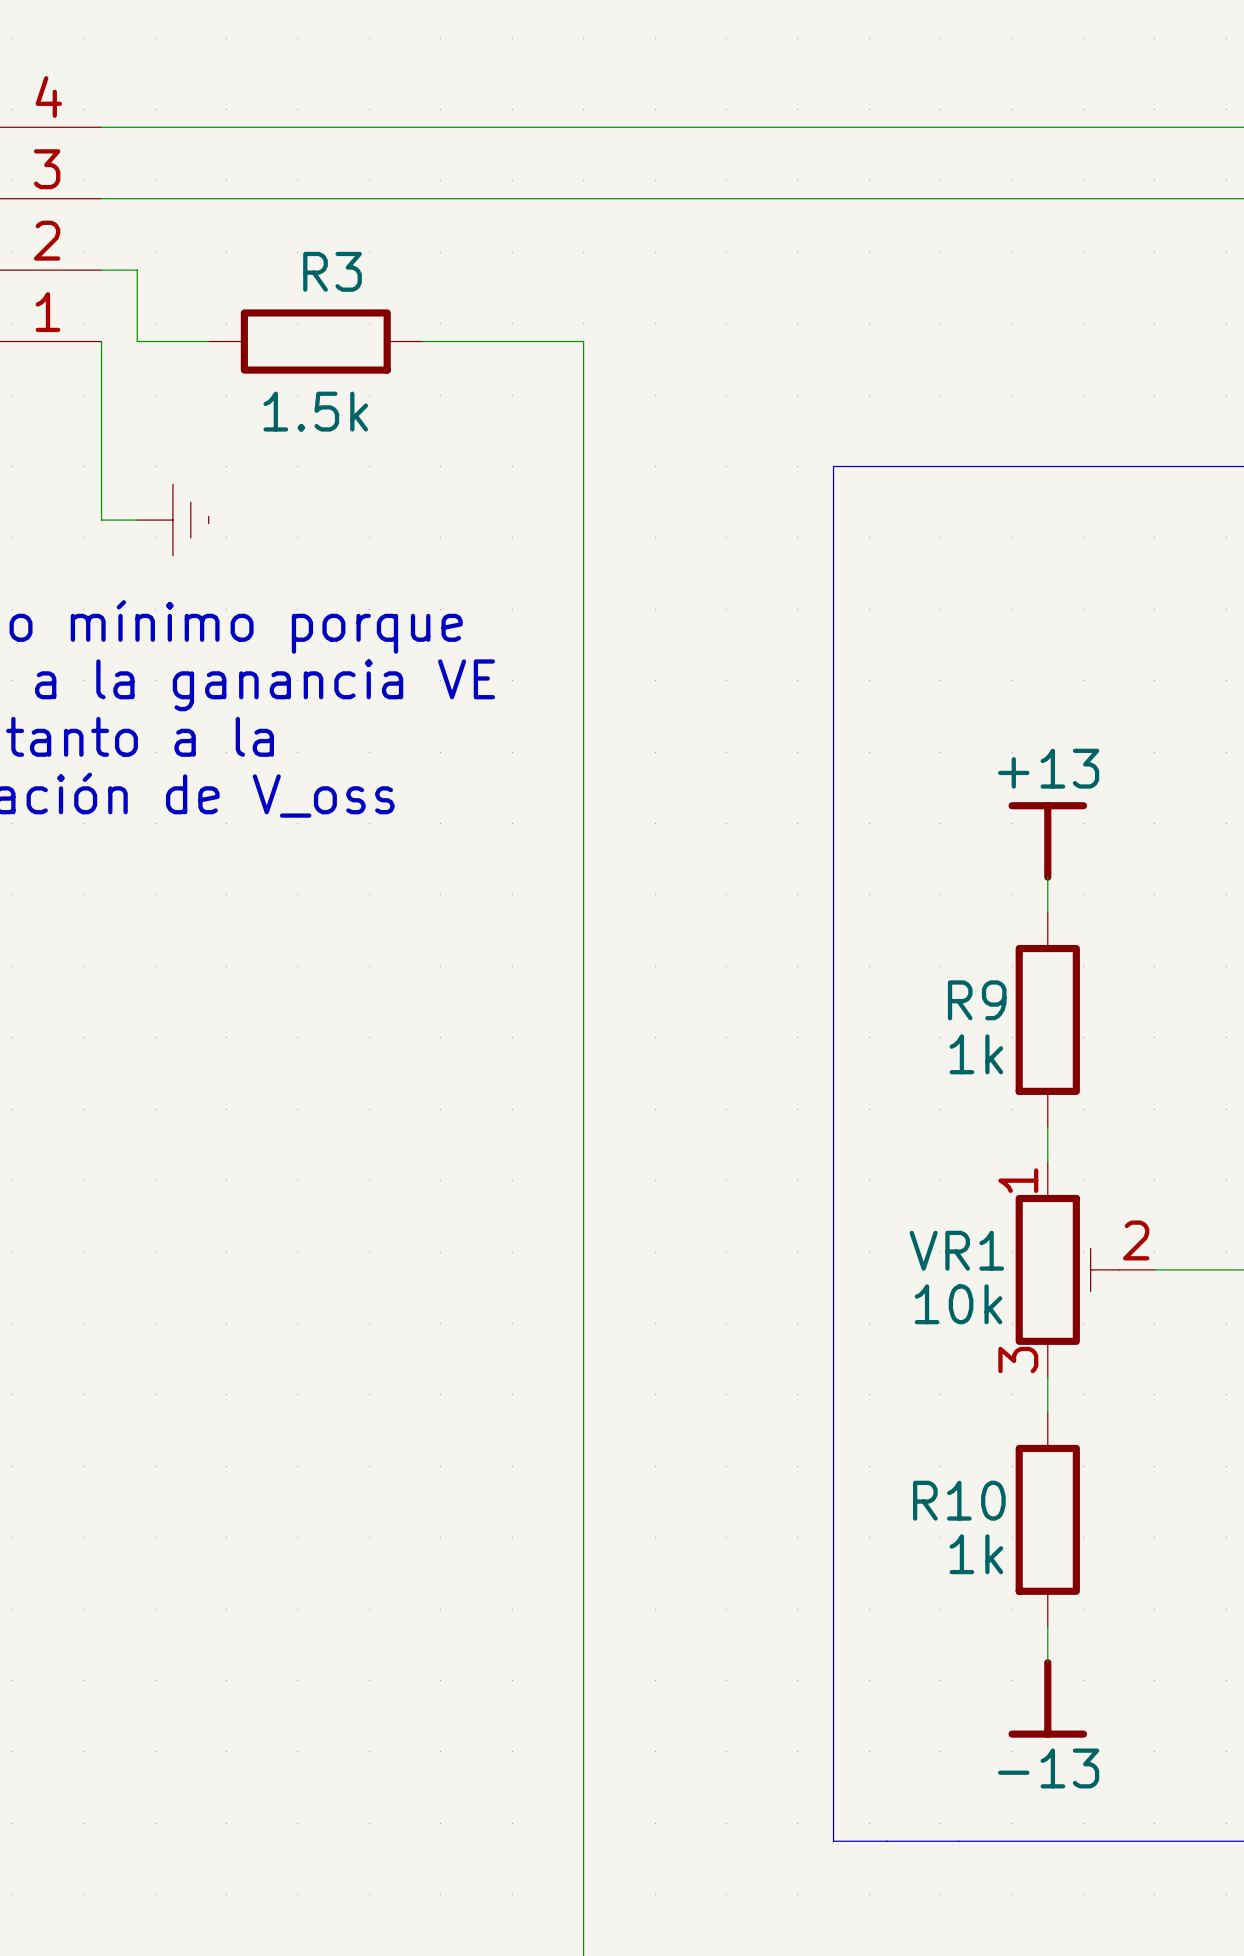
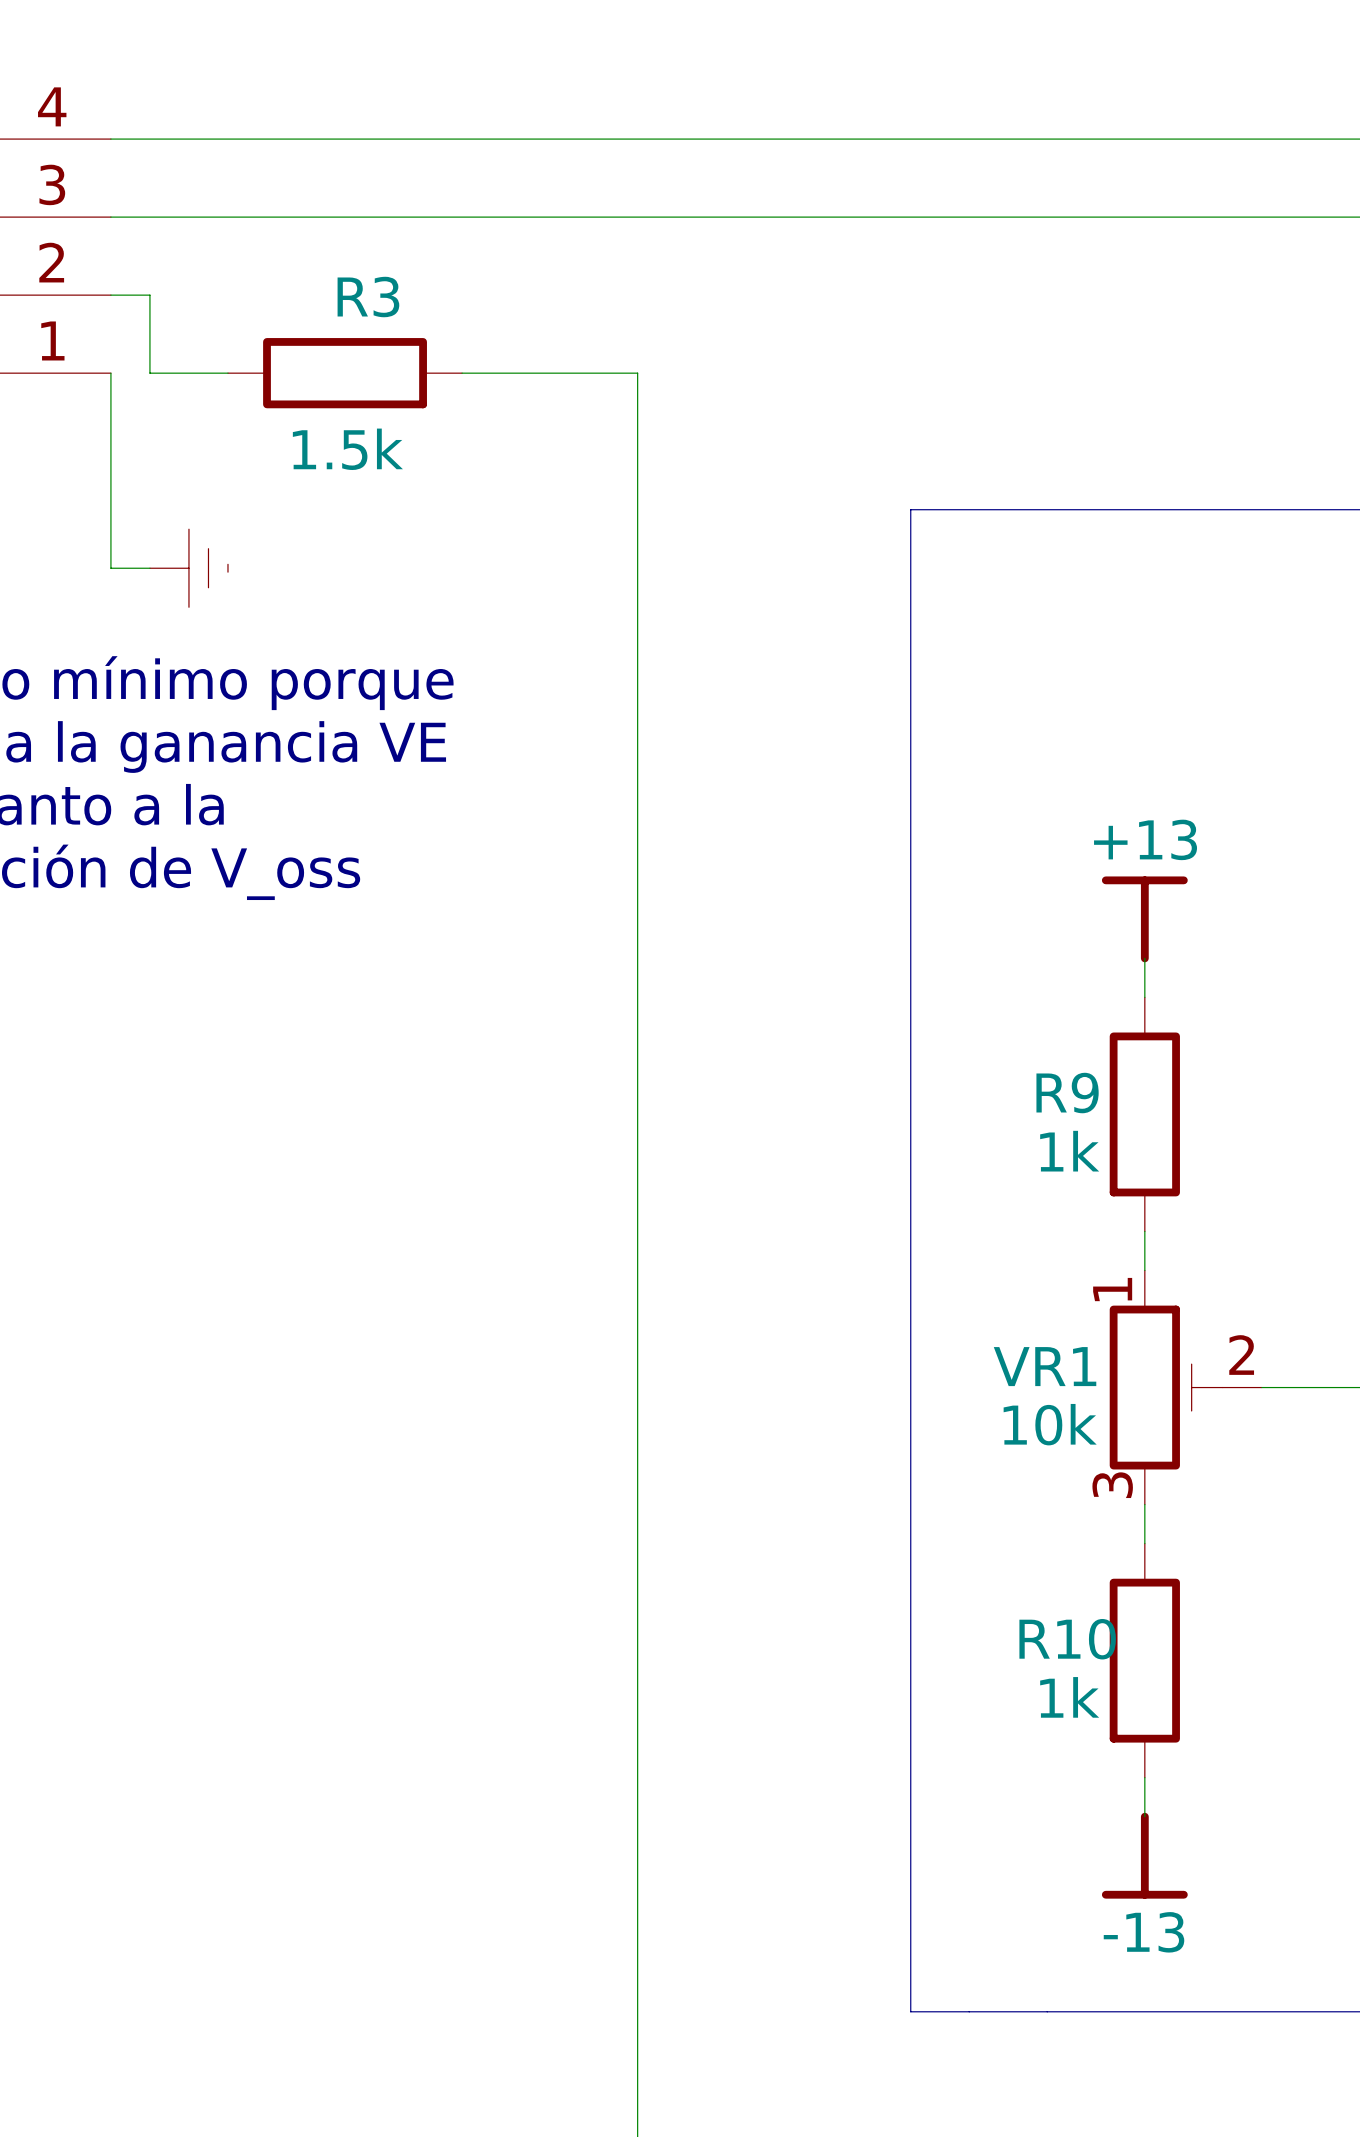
R10 name position: R10 (959, 1500) -> R10 (1067, 1639)

